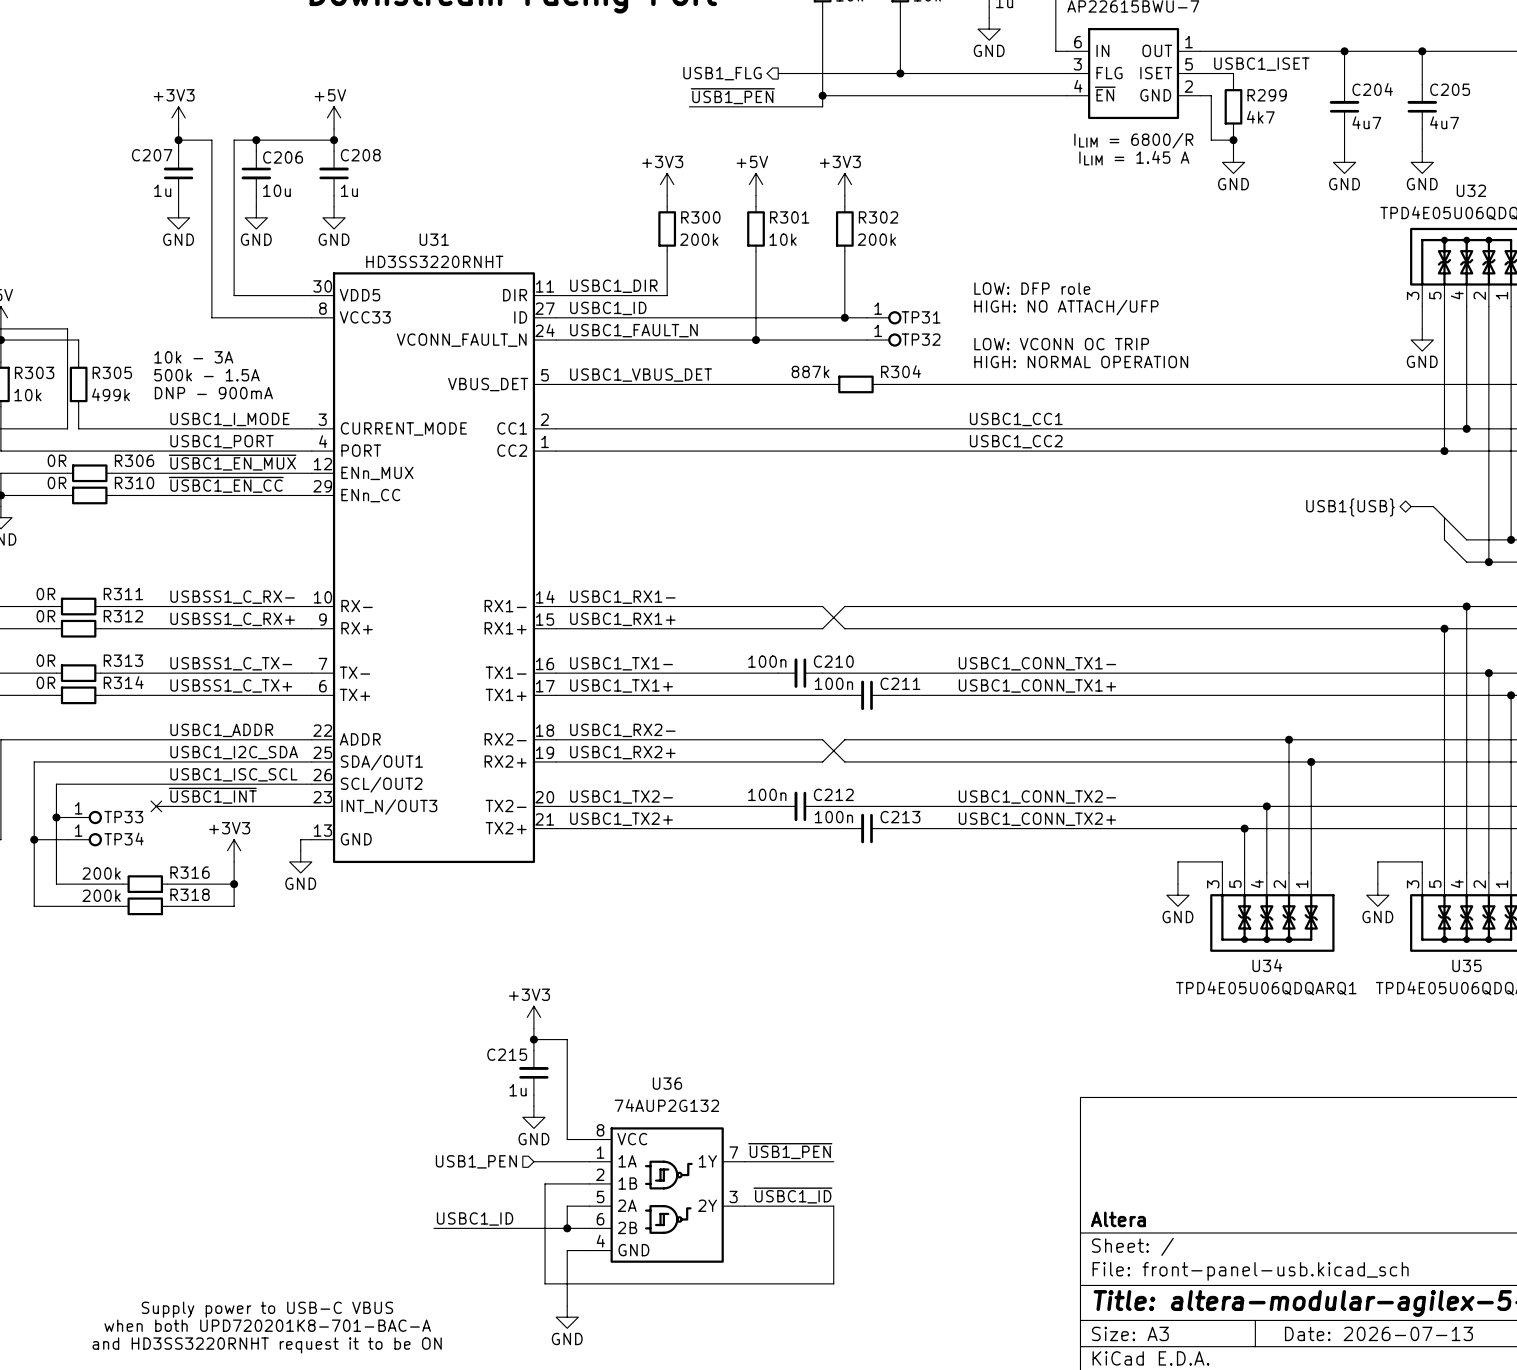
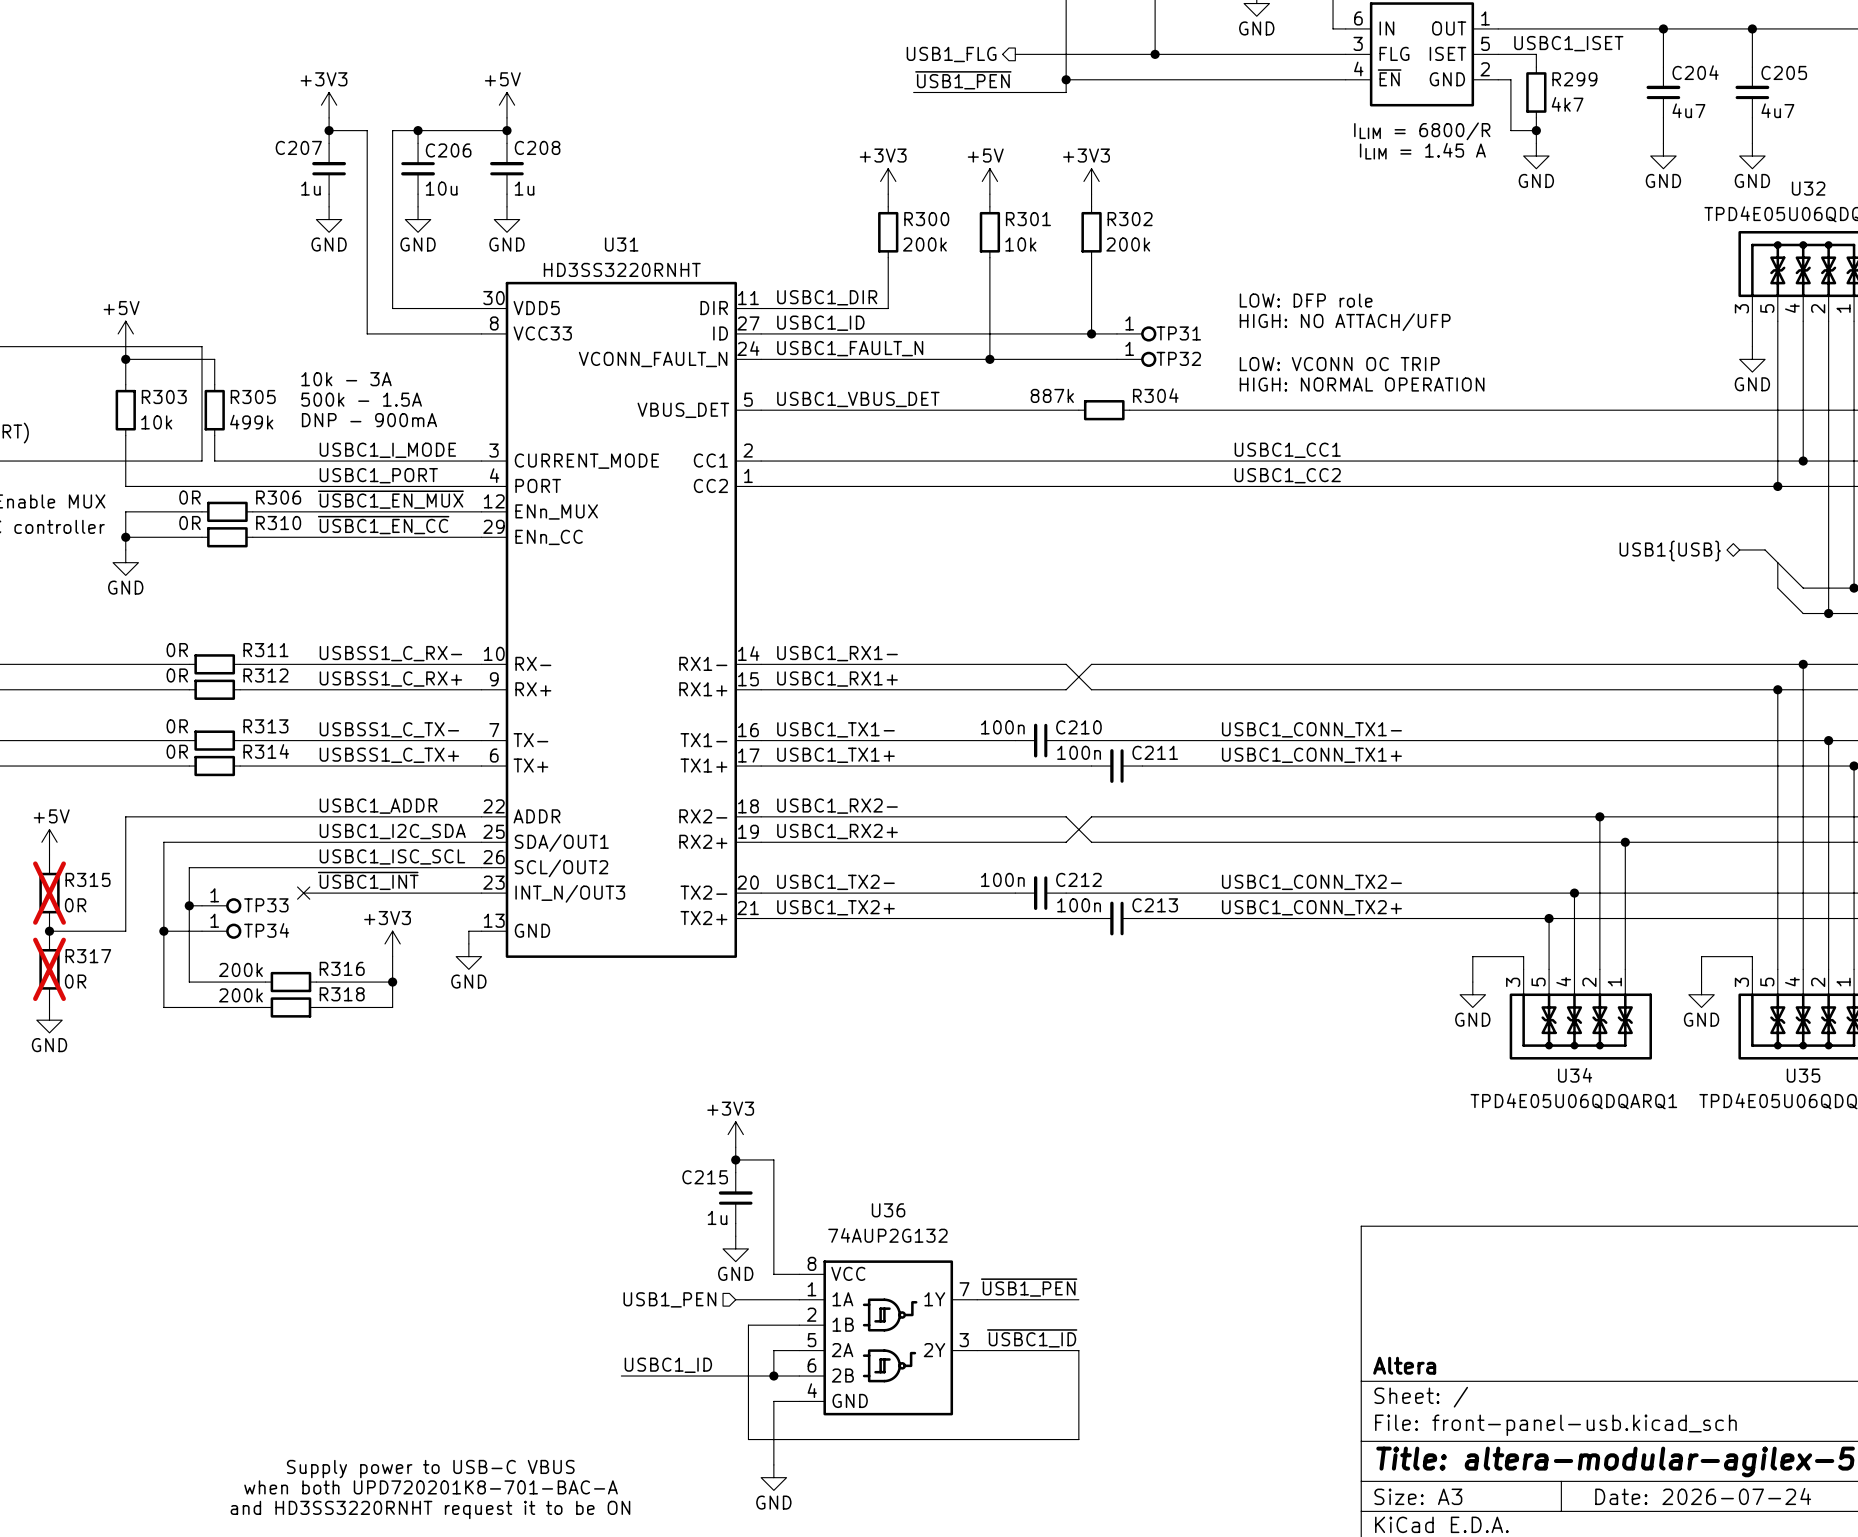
title block: Date: 2026-07-13 (1378, 1333) -> Date: 2026-07-24 (1703, 1496)

